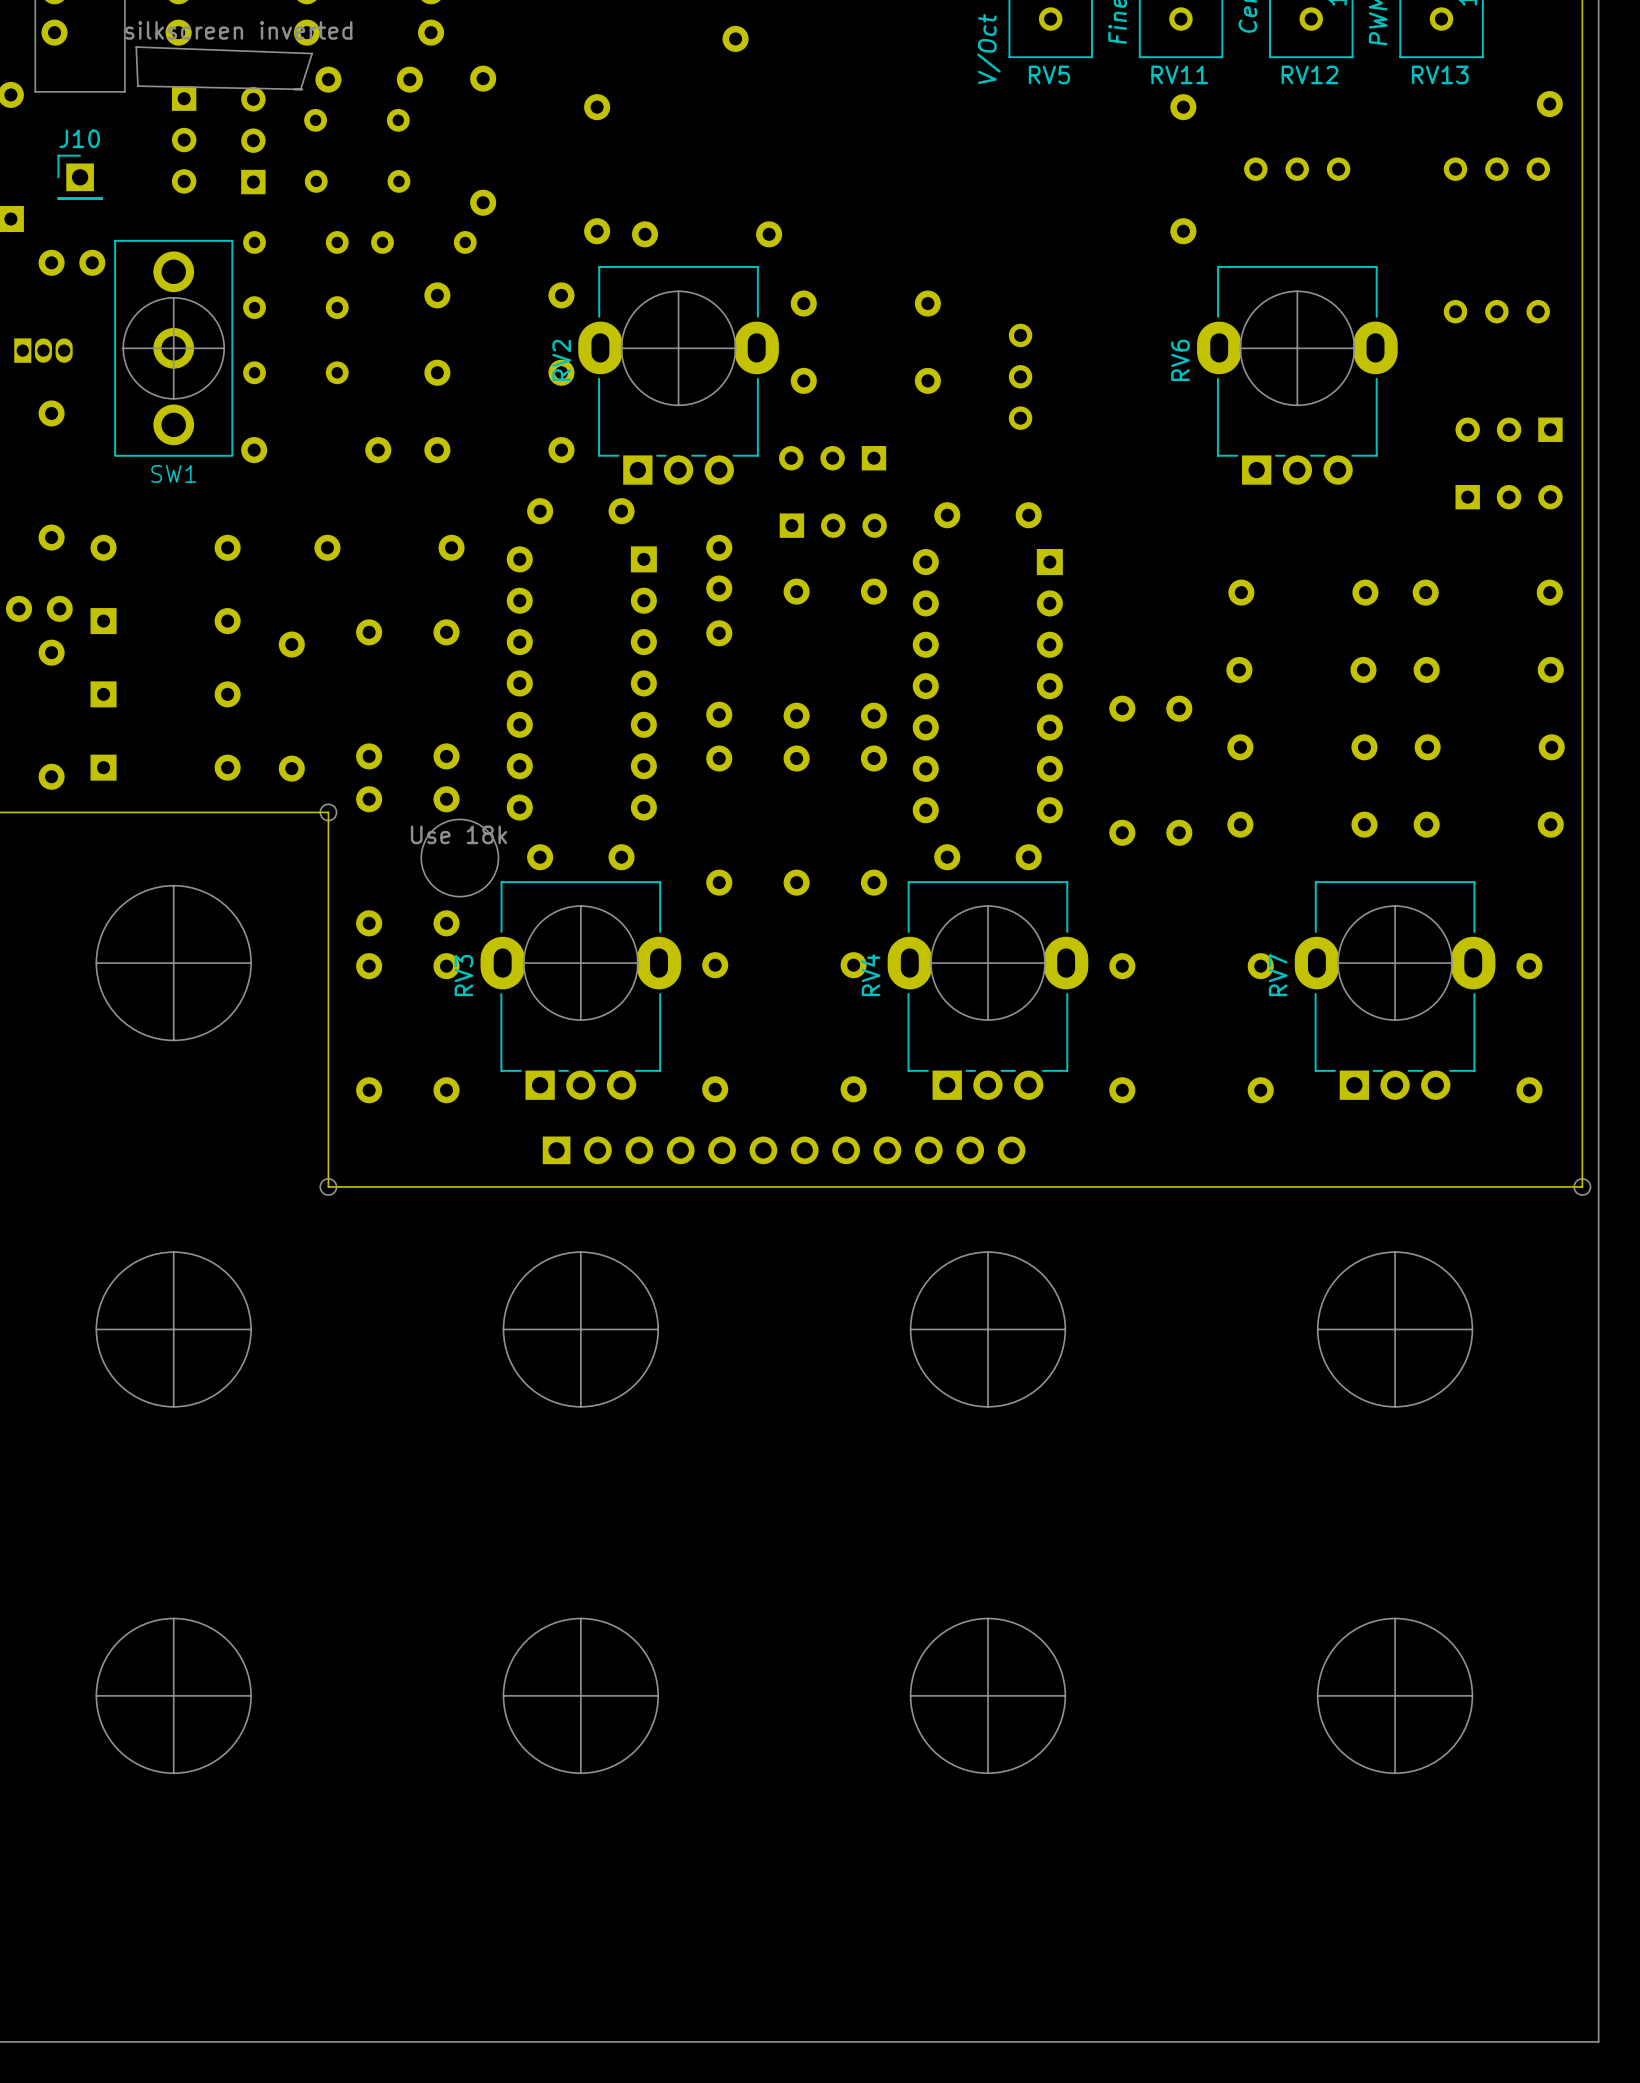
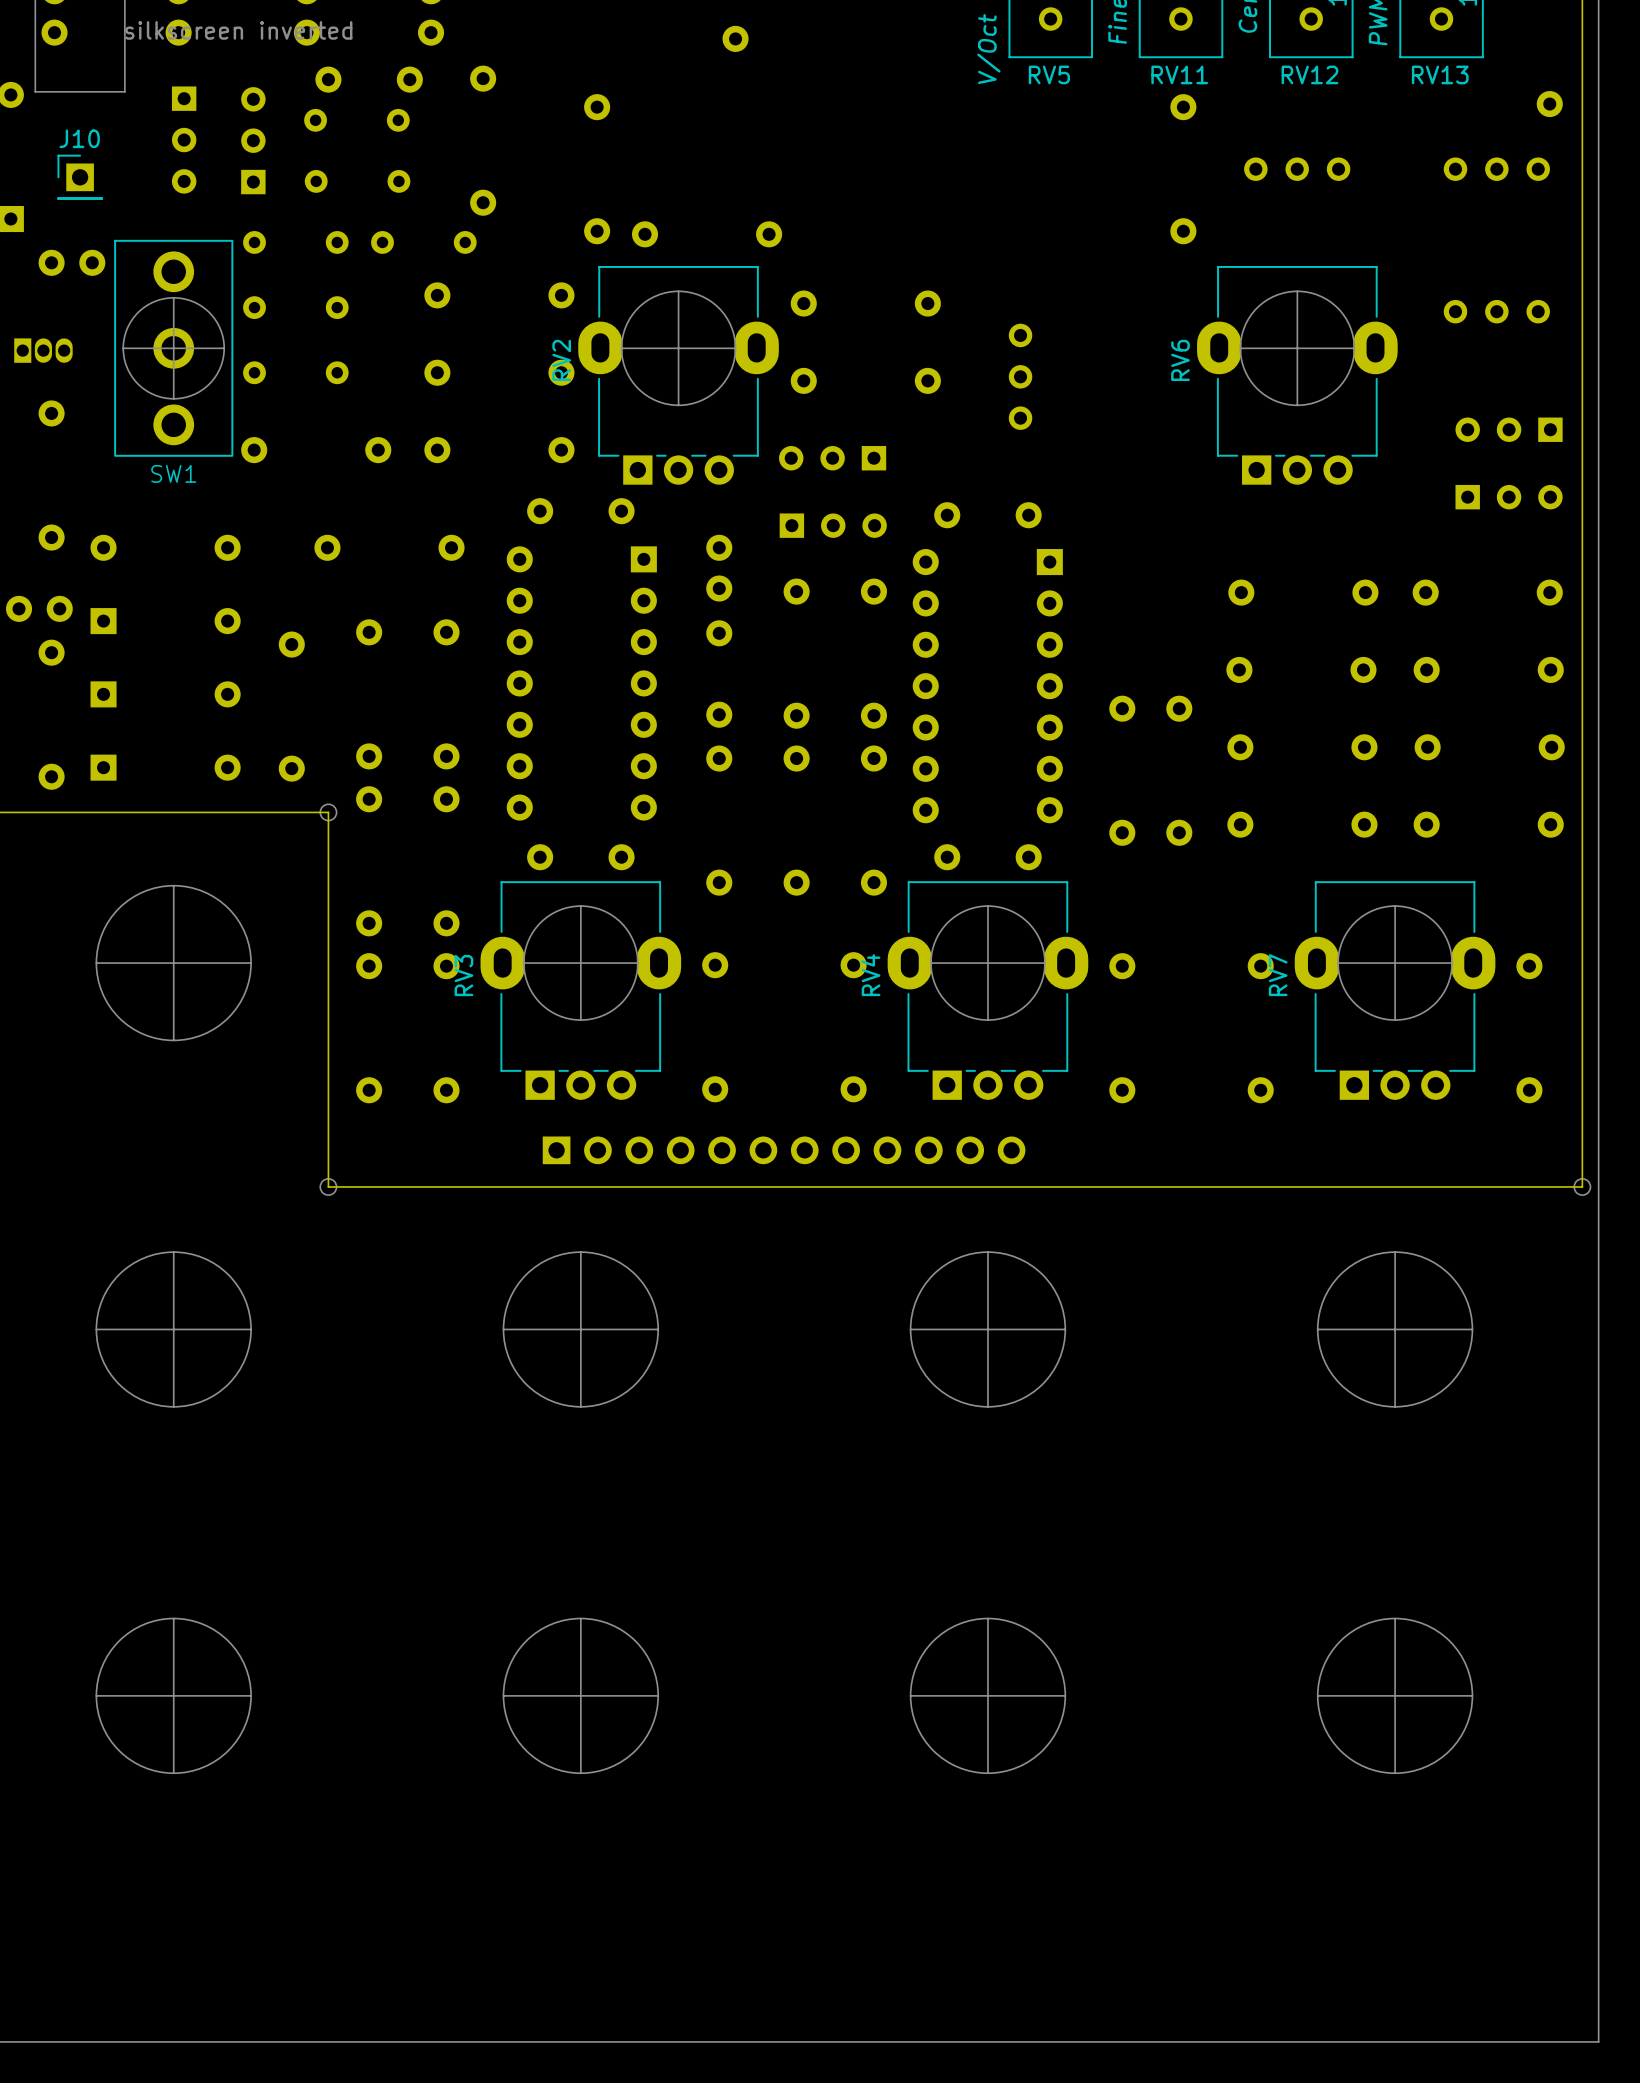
line: (294, 89) (302, 89) (137, 86) (136, 47) (312, 53) (300, 89) -> none
drawing: [420, 818, 500, 898] -> none
text: Use 18k (459, 834) -> none

